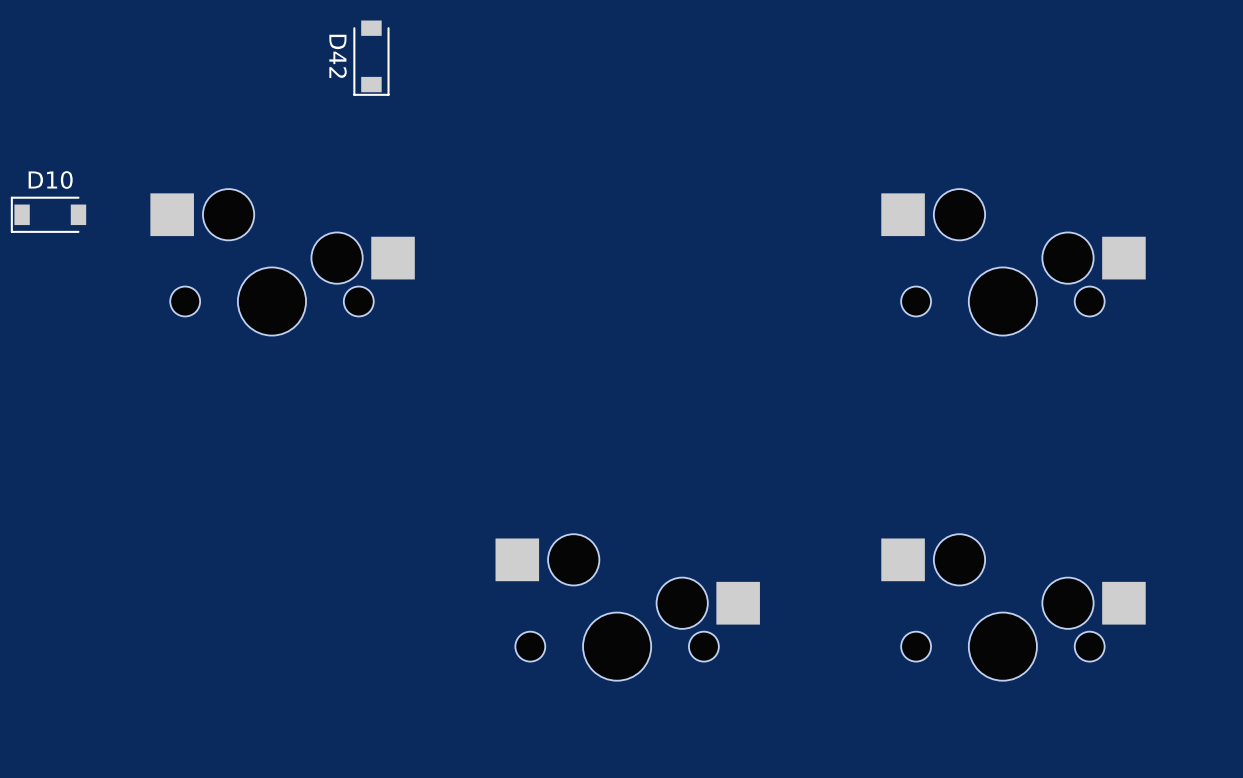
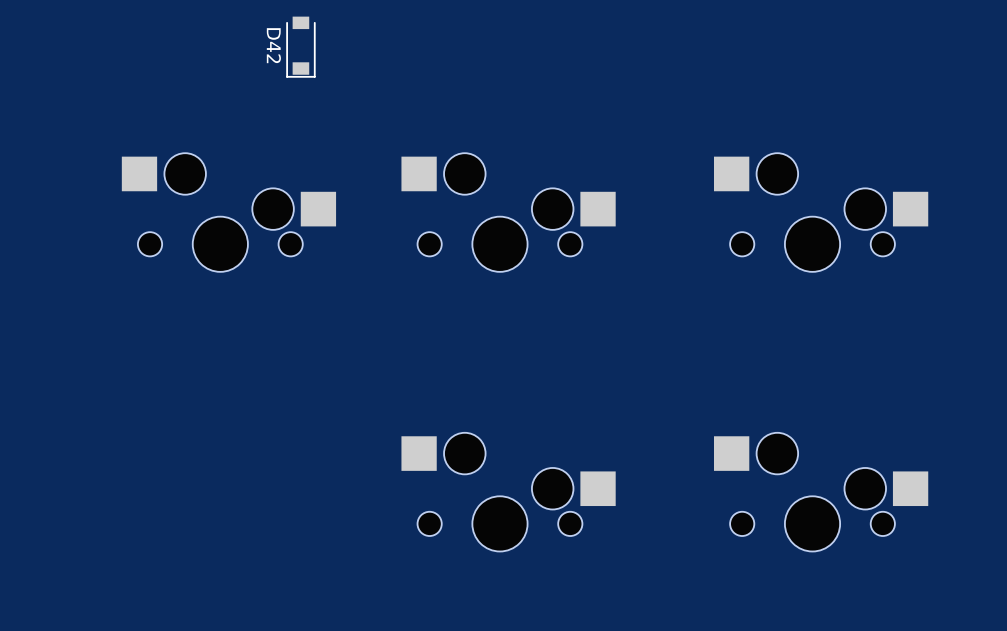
D10: (48, 214) -> none
part: none -> (508, 212)

